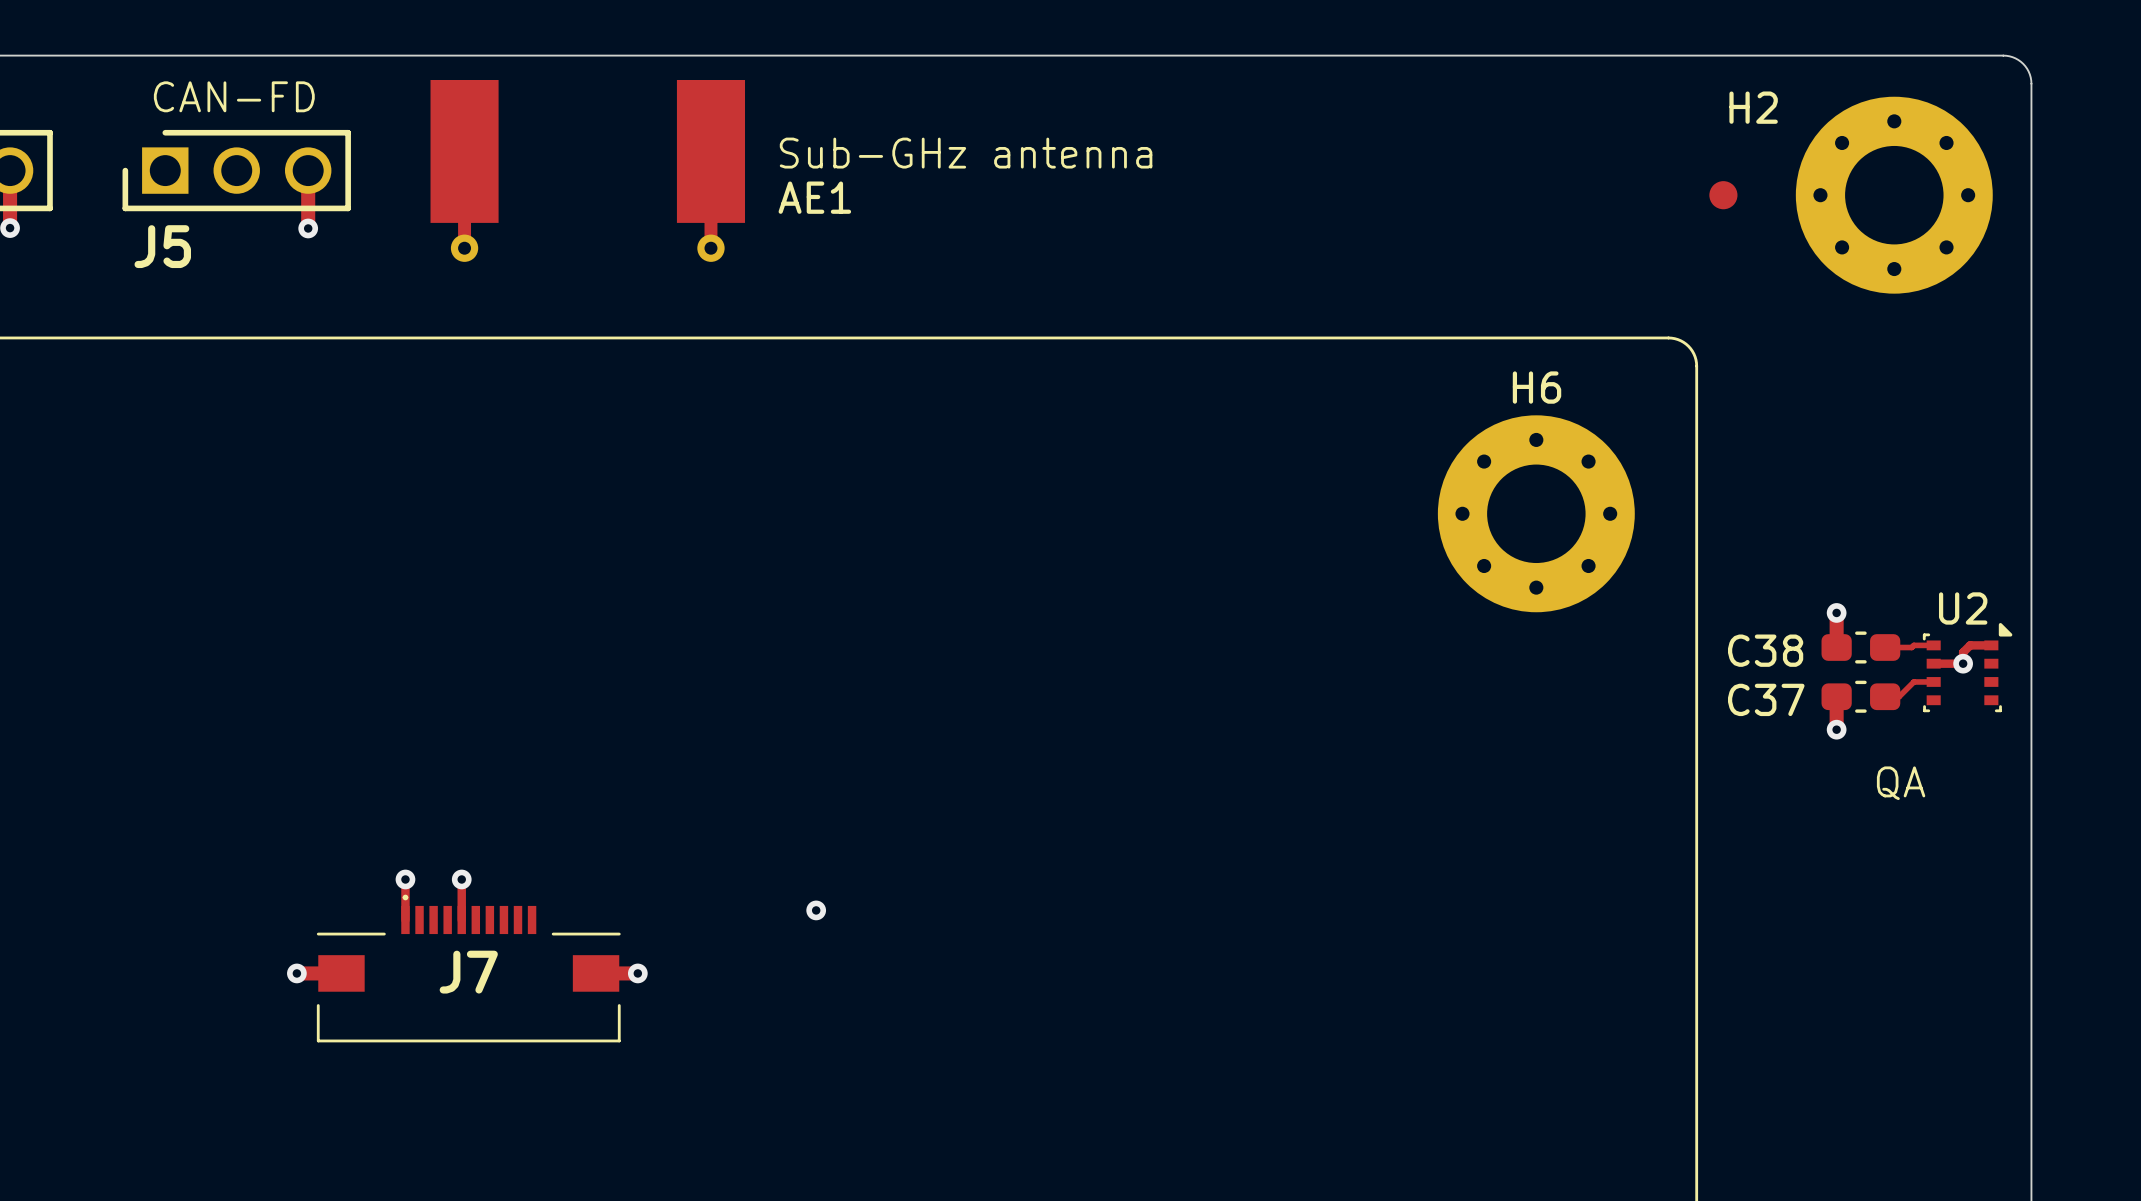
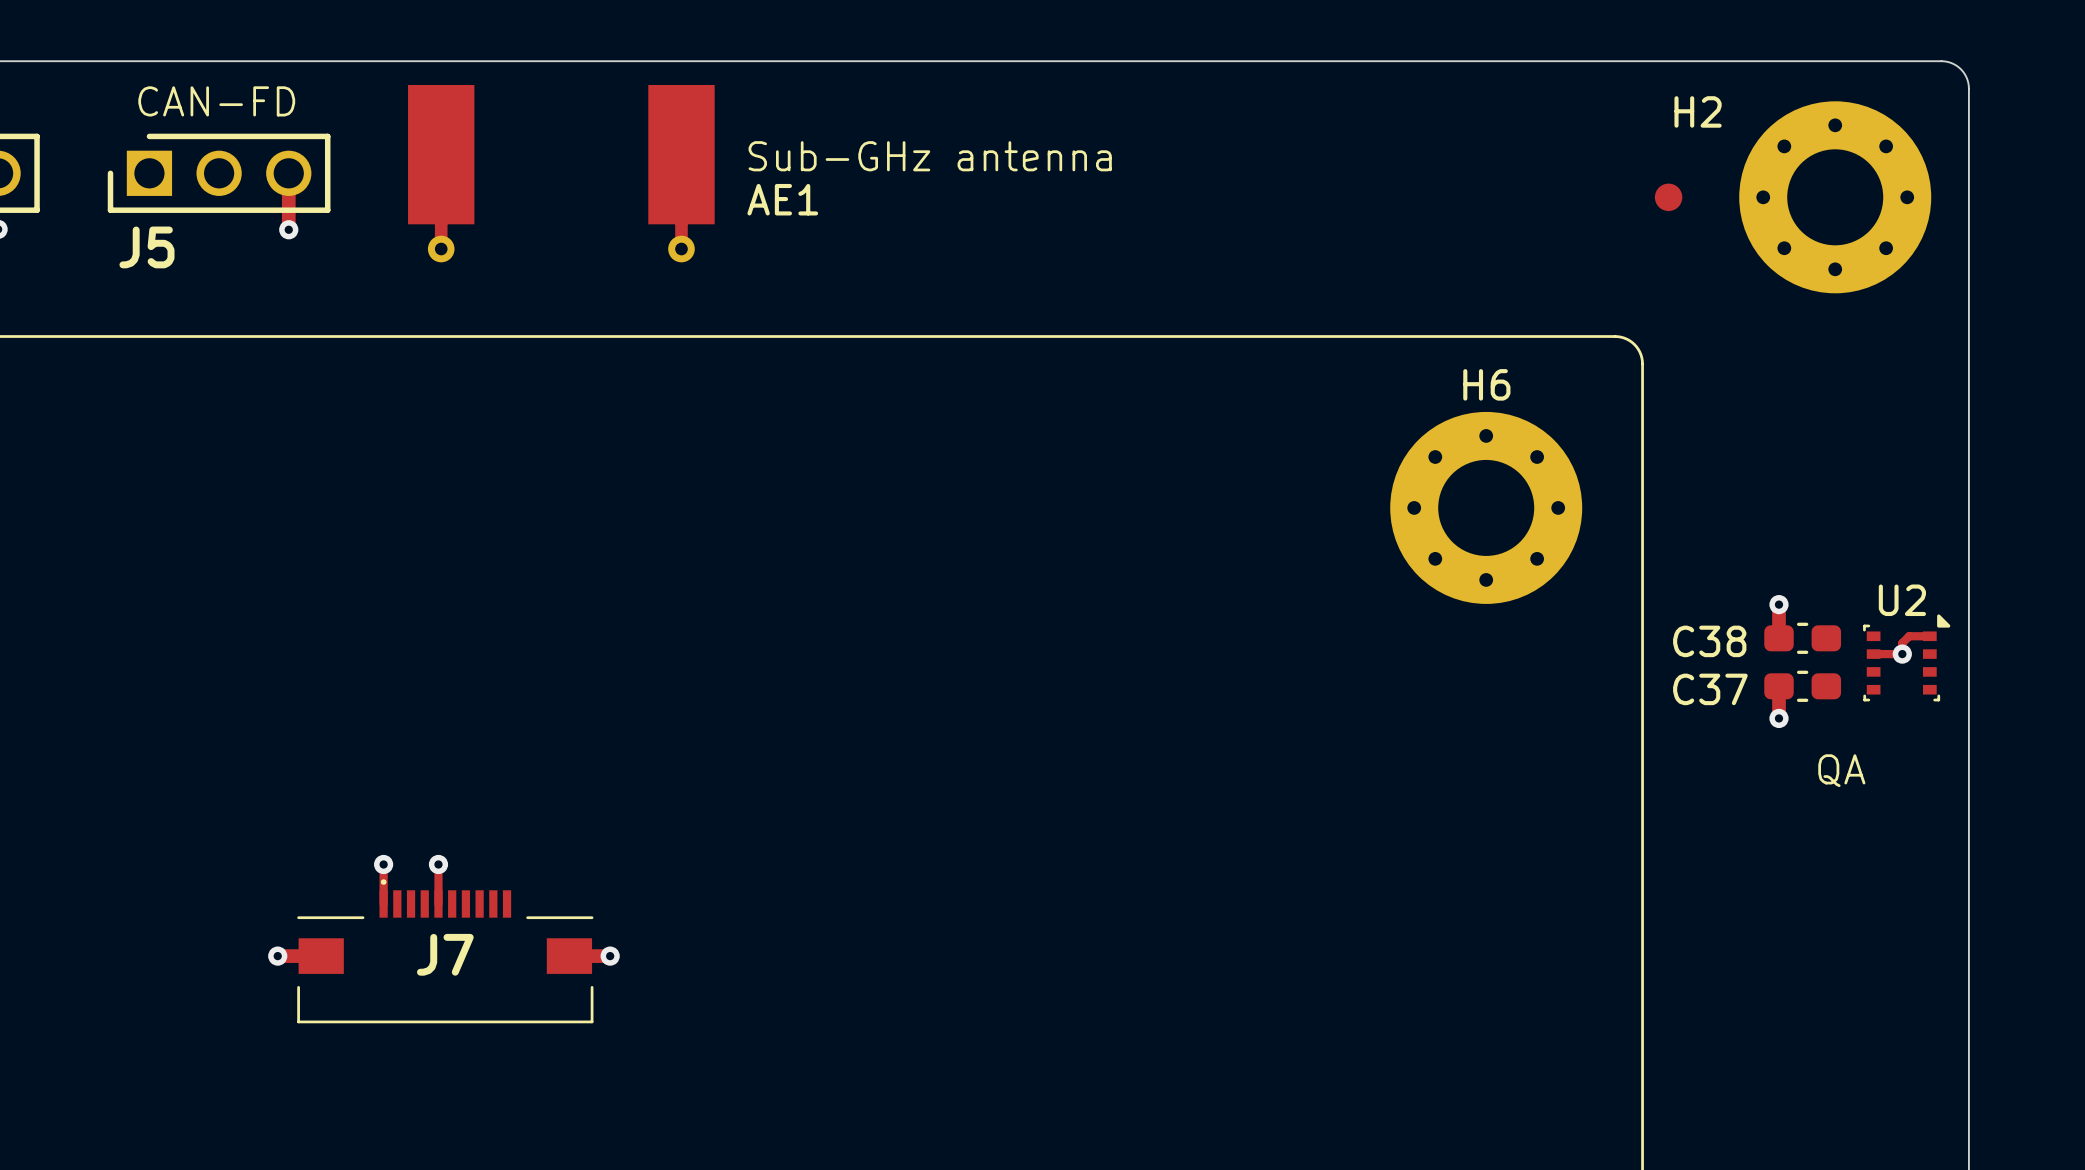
track: (1933, 645) (1885, 647) -> none
track: (1933, 681) (1913, 681) (1899, 696) (1885, 696) -> none
via: (816, 910) -> none

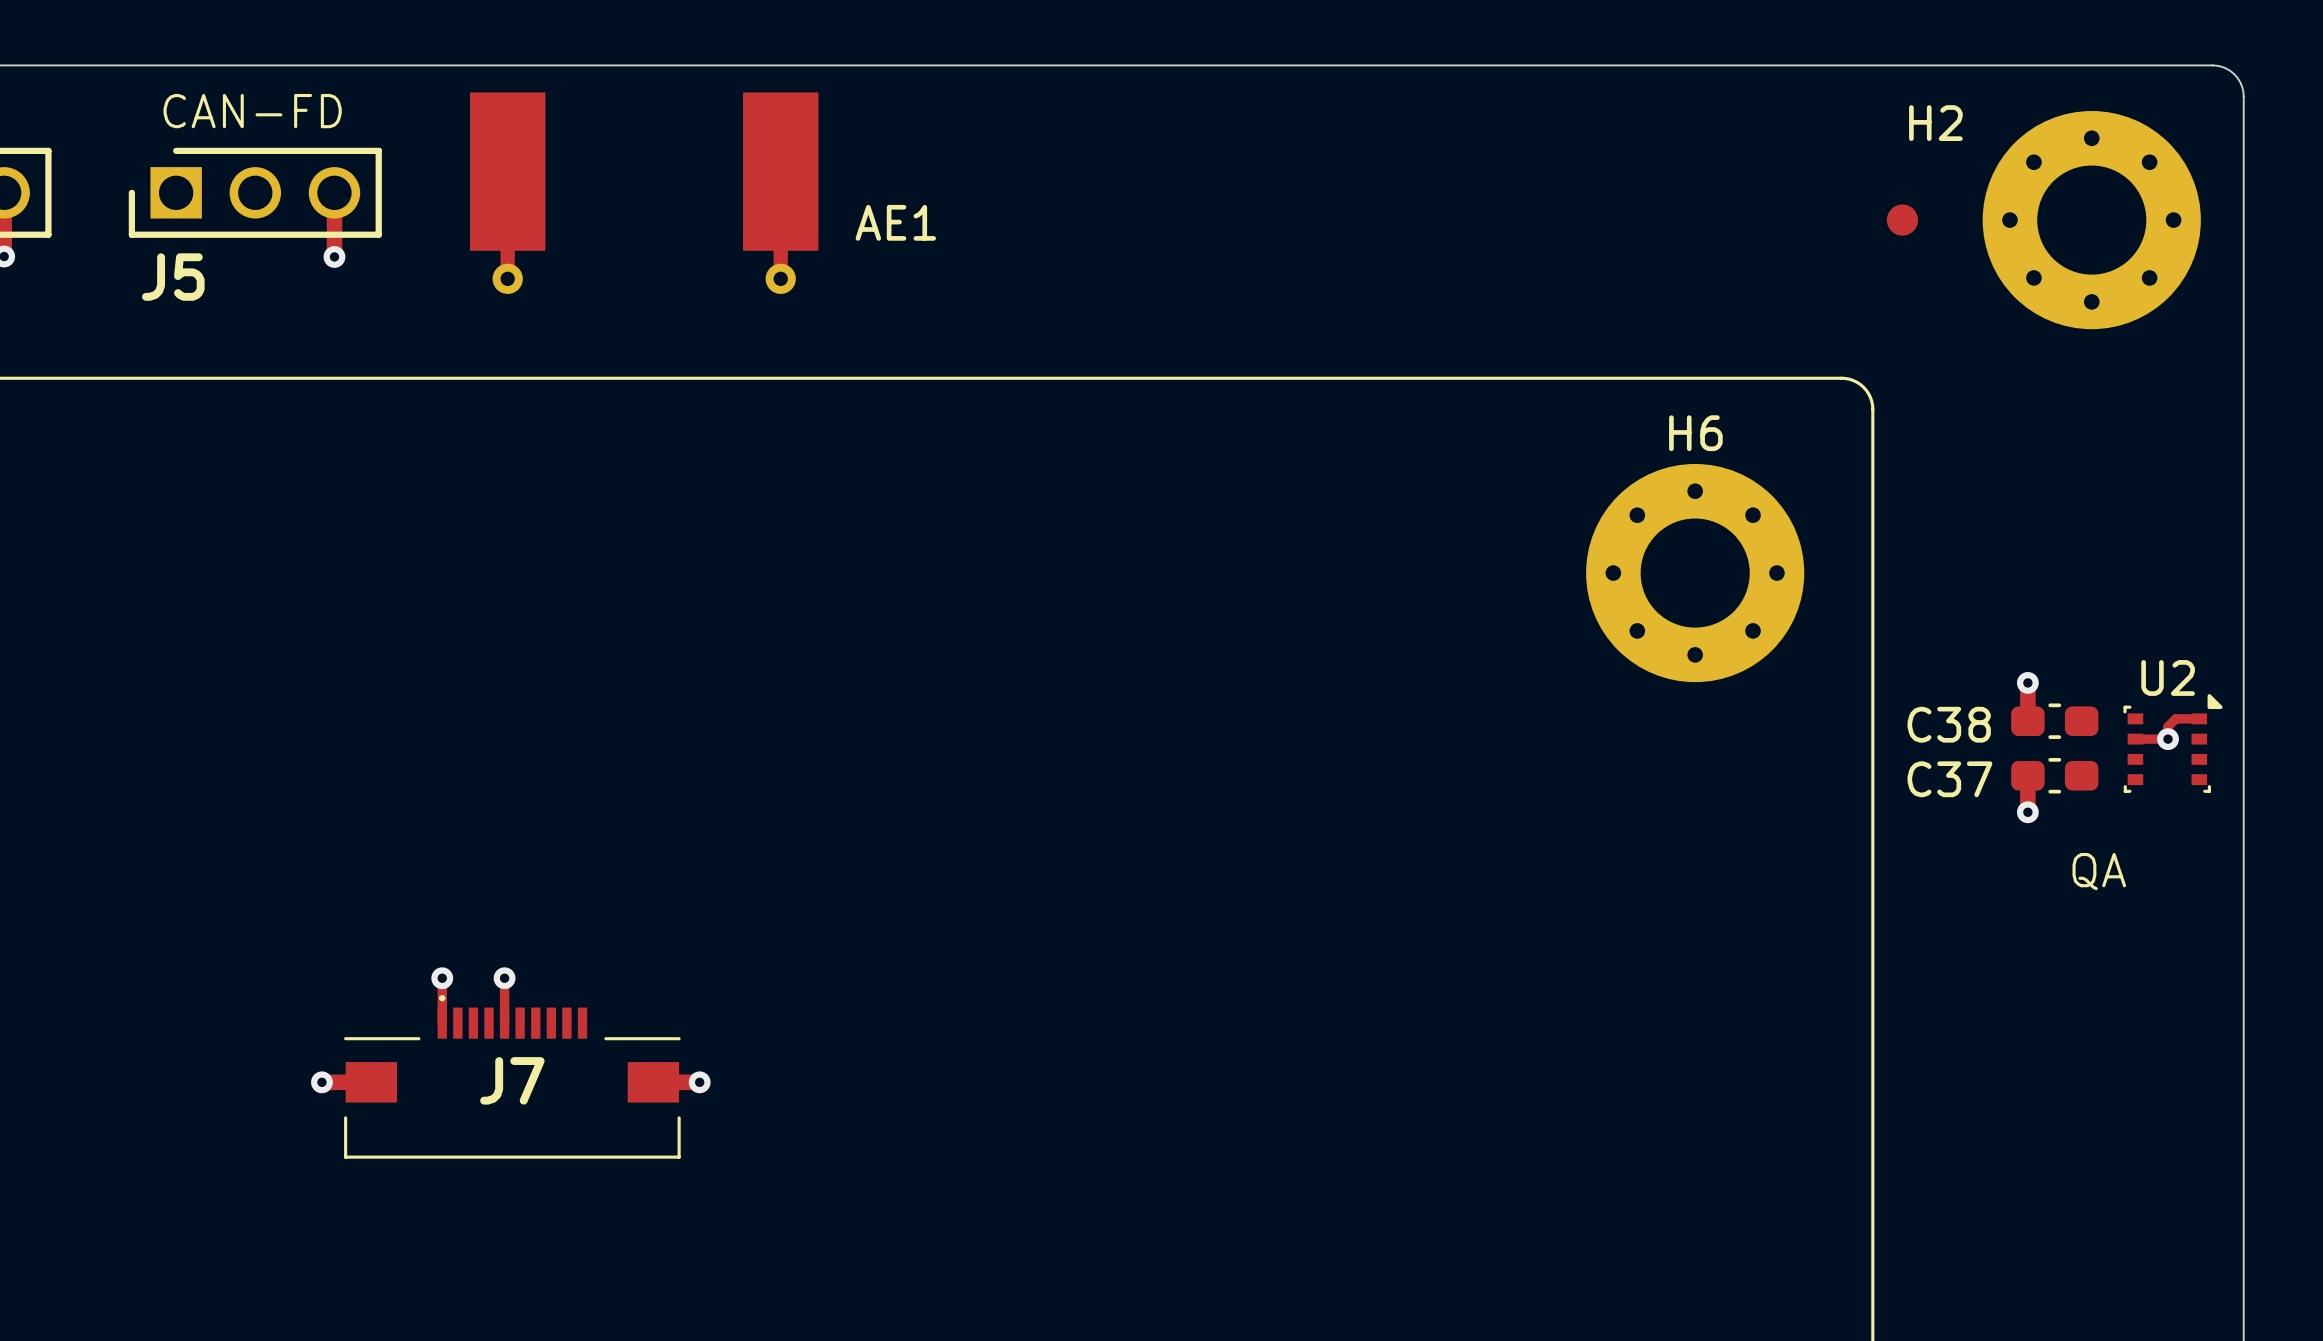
text: Sub-GHz antenna (930, 156) -> none

